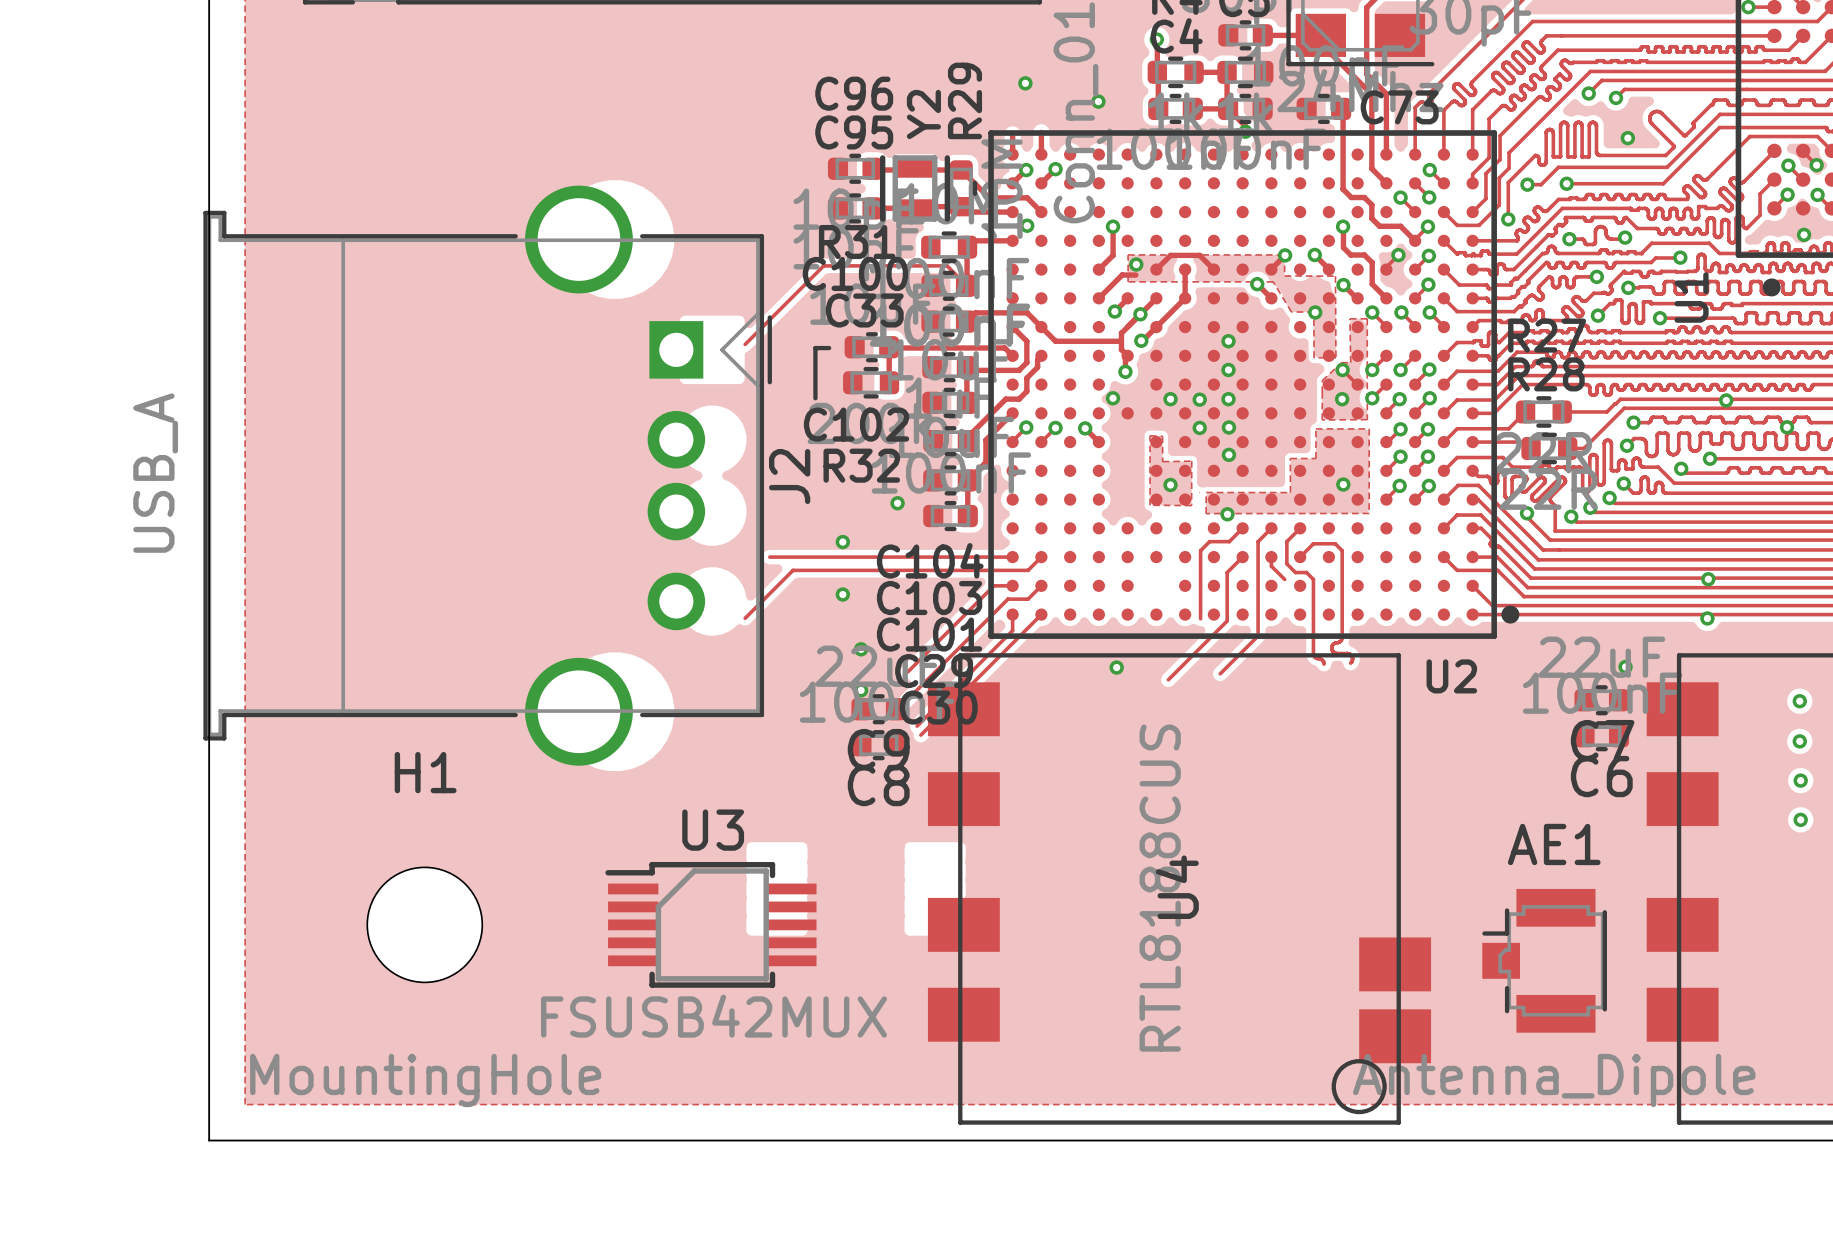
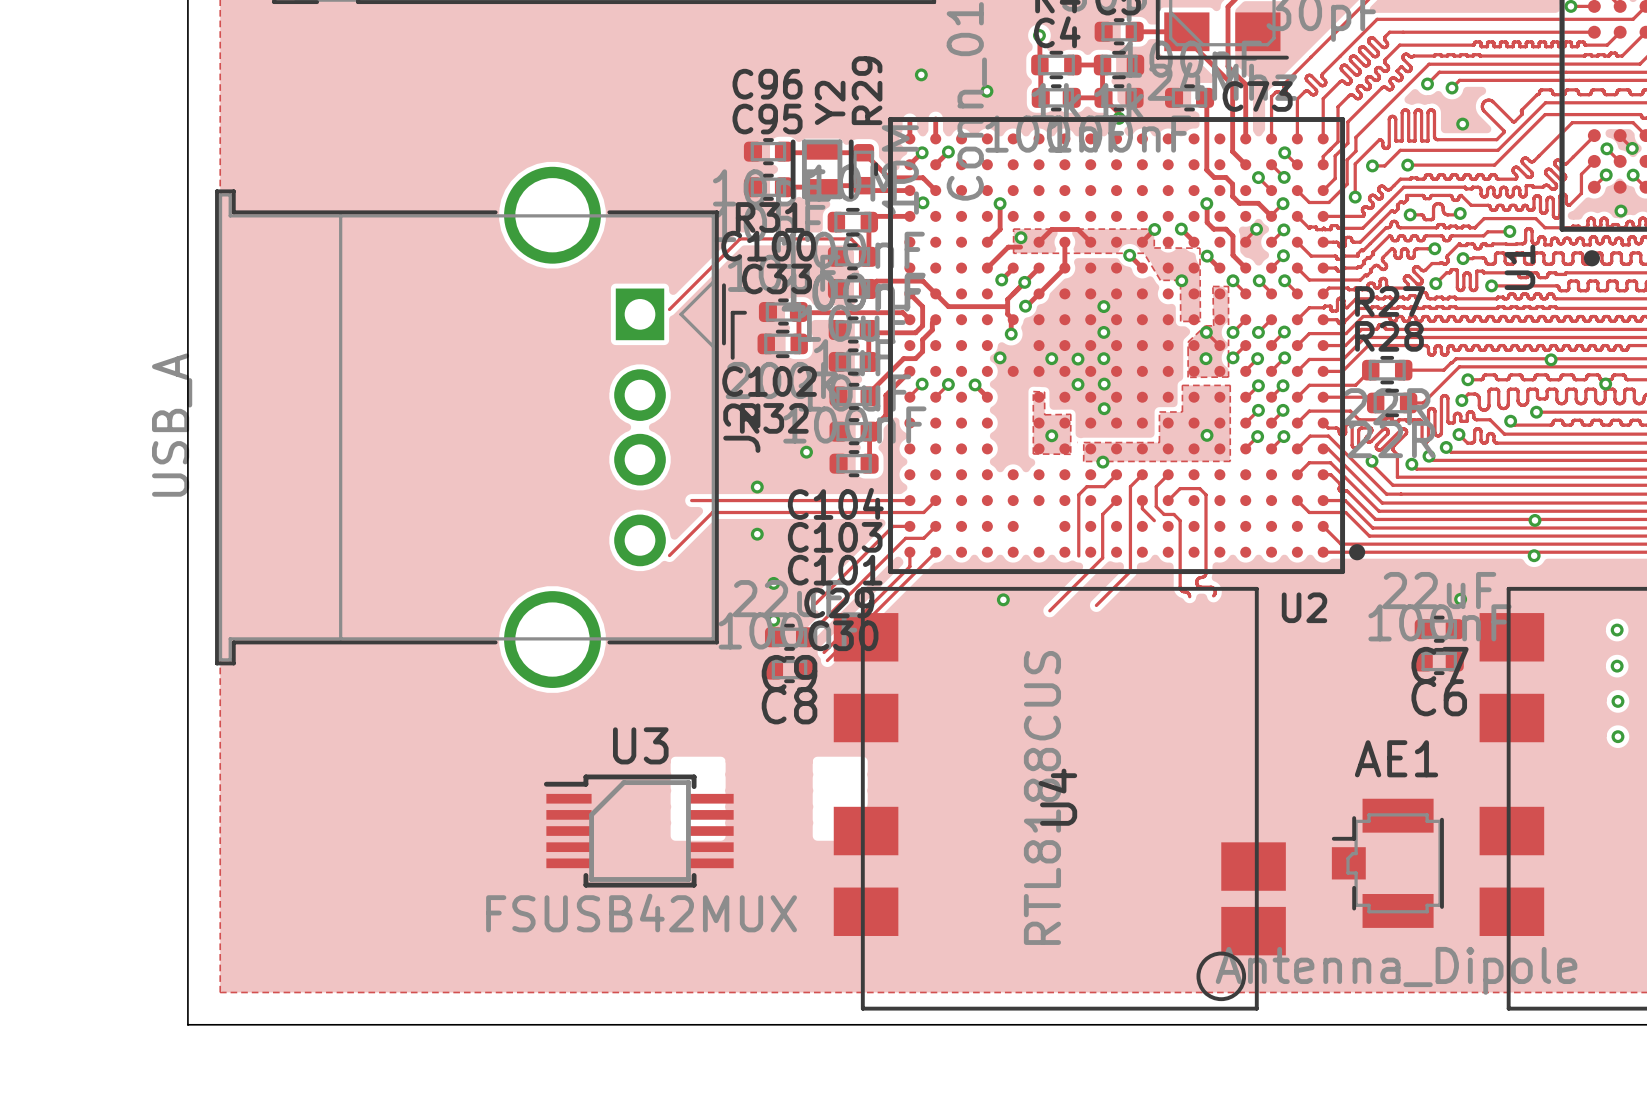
J2 position: (487, 475) -> (470, 427)
H1: MountingHole (424, 924) -> none

